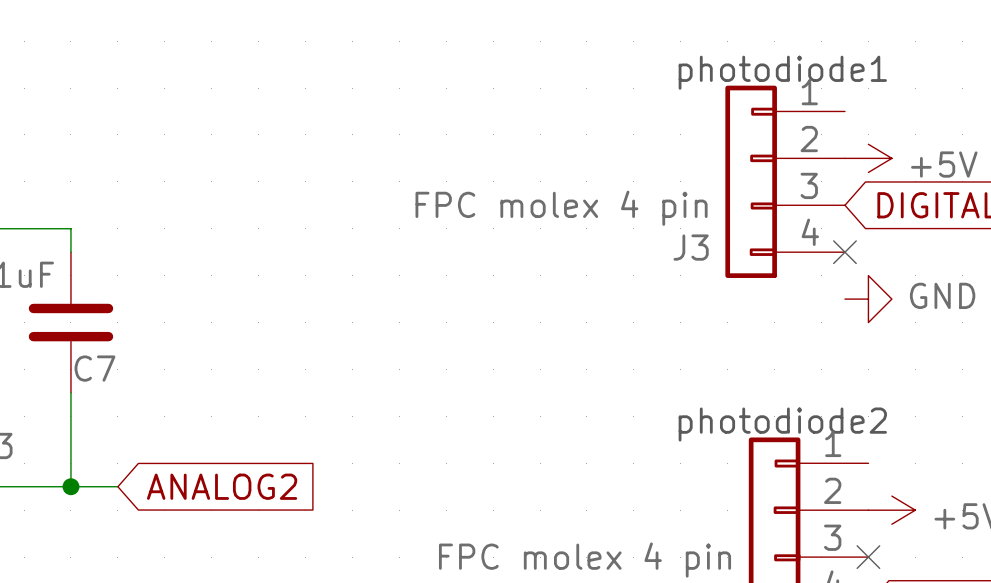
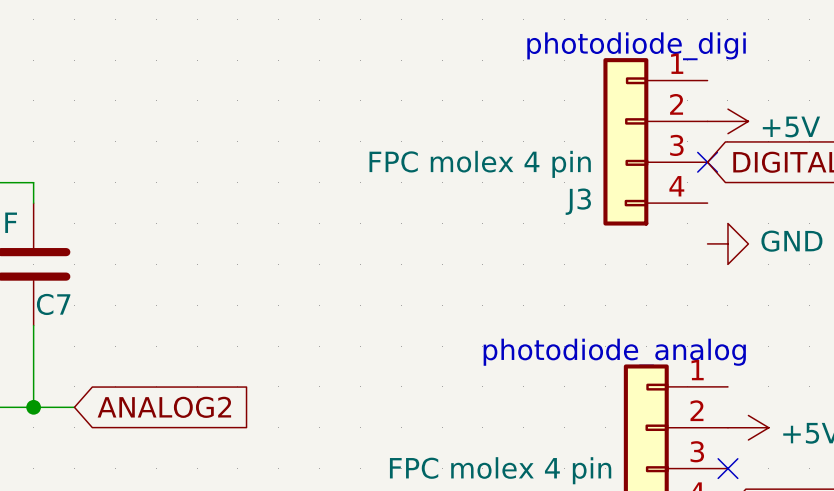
text: photodiode1 (782, 72) -> photodiode_digi (636, 46)
no-connect mark position: (844, 252) -> (707, 162)
text: photodiode2 (782, 424) -> photodiode_analog (614, 352)

